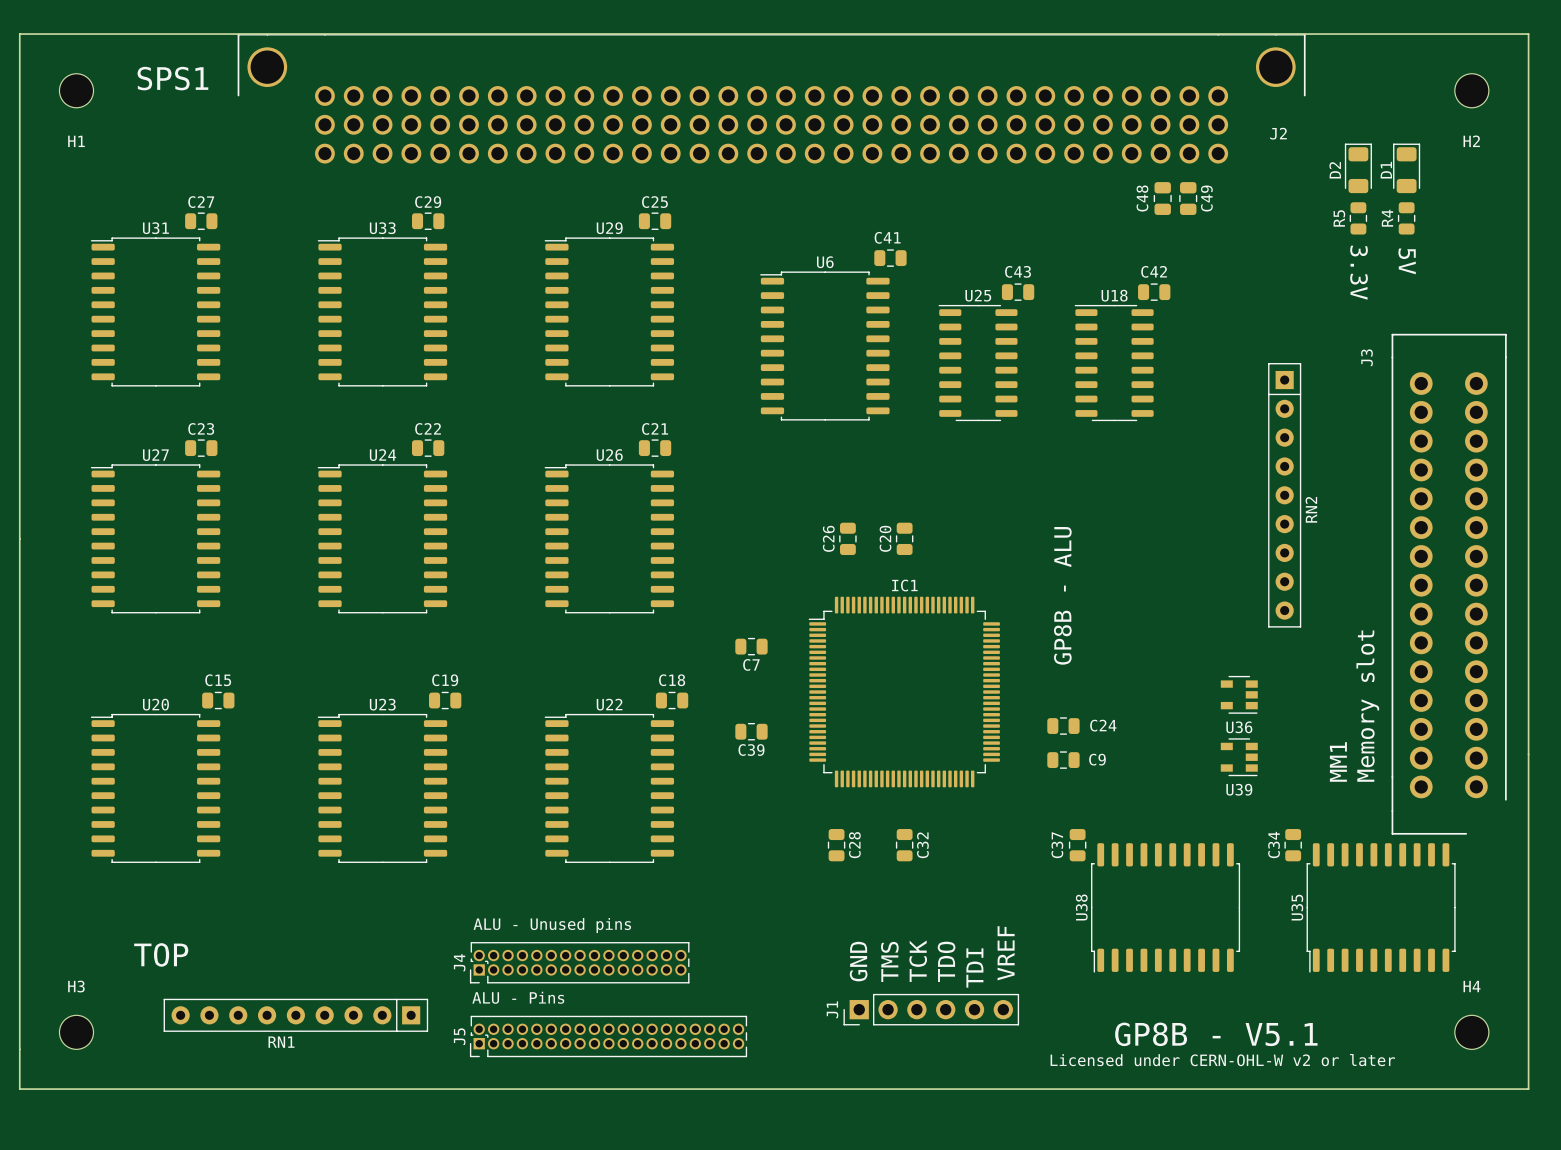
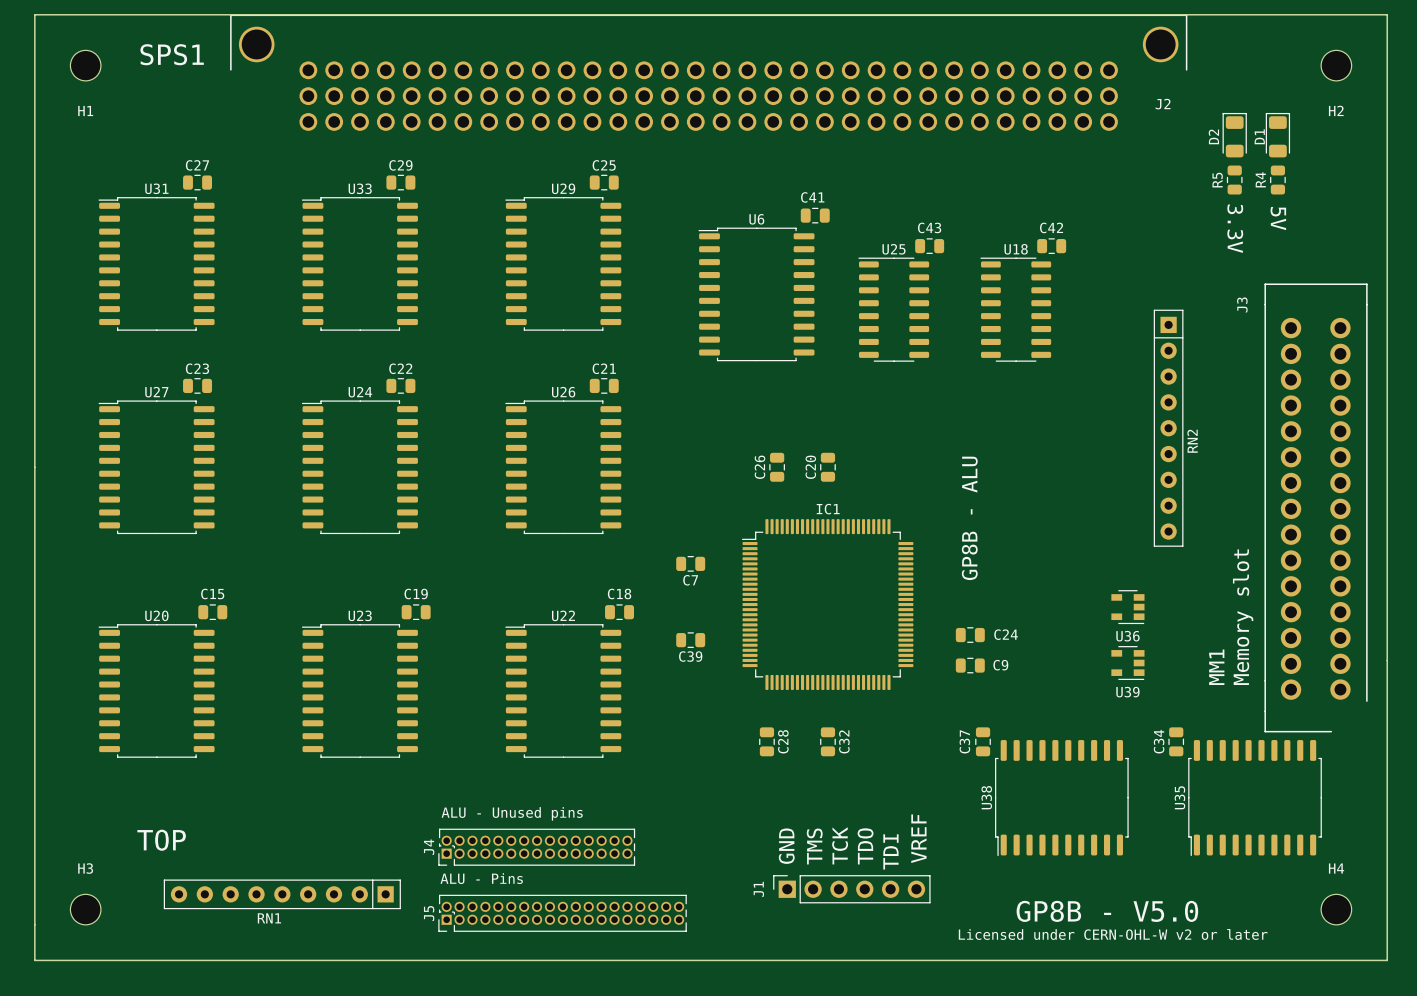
C48: (1162, 198) -> none
C49: (1188, 198) -> none
J1 footprint: [843, 993, 1020, 1026] -> [773, 875, 931, 904]
text: GP8B - V5.1 (1216, 1034) -> GP8B - V5.0 (1107, 911)

